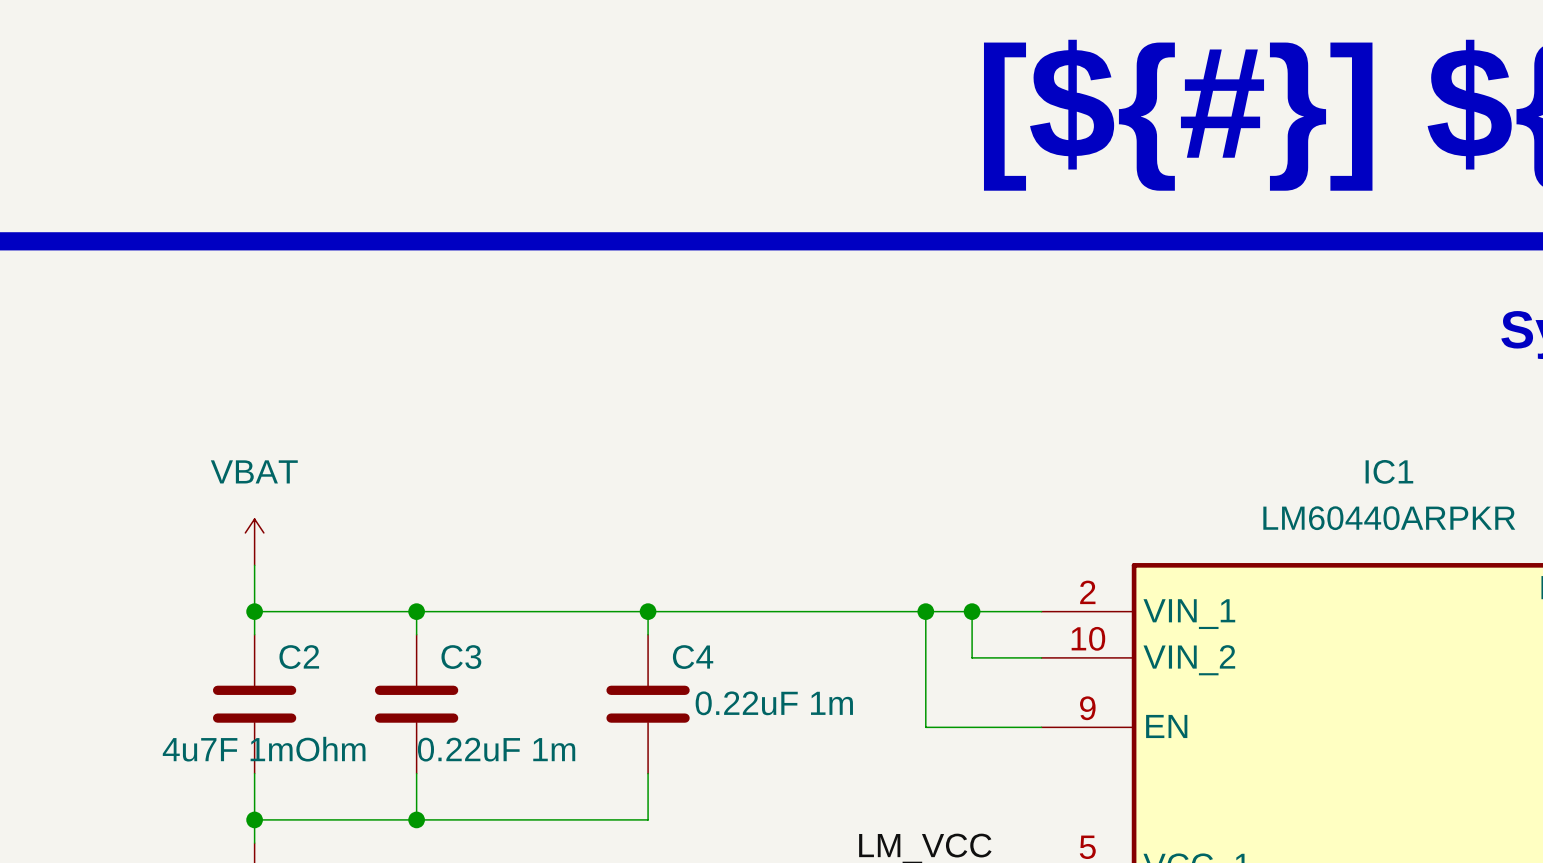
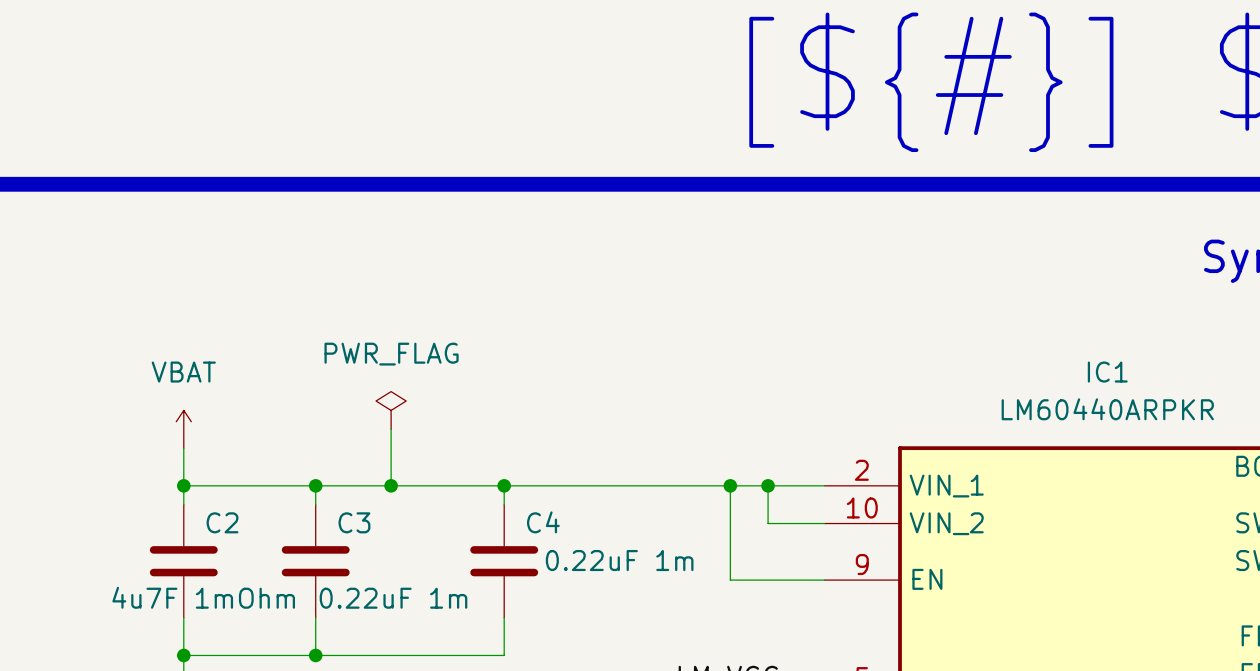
power symbol: none -> PWR_FLAG (391, 410)
wire: none -> (391, 429) (391, 485)
junction: none -> (391, 485)

